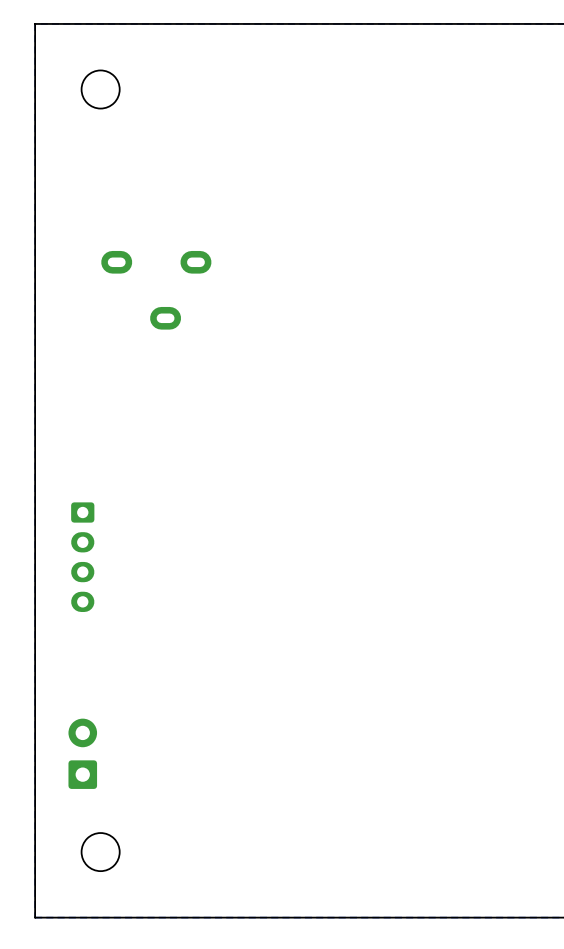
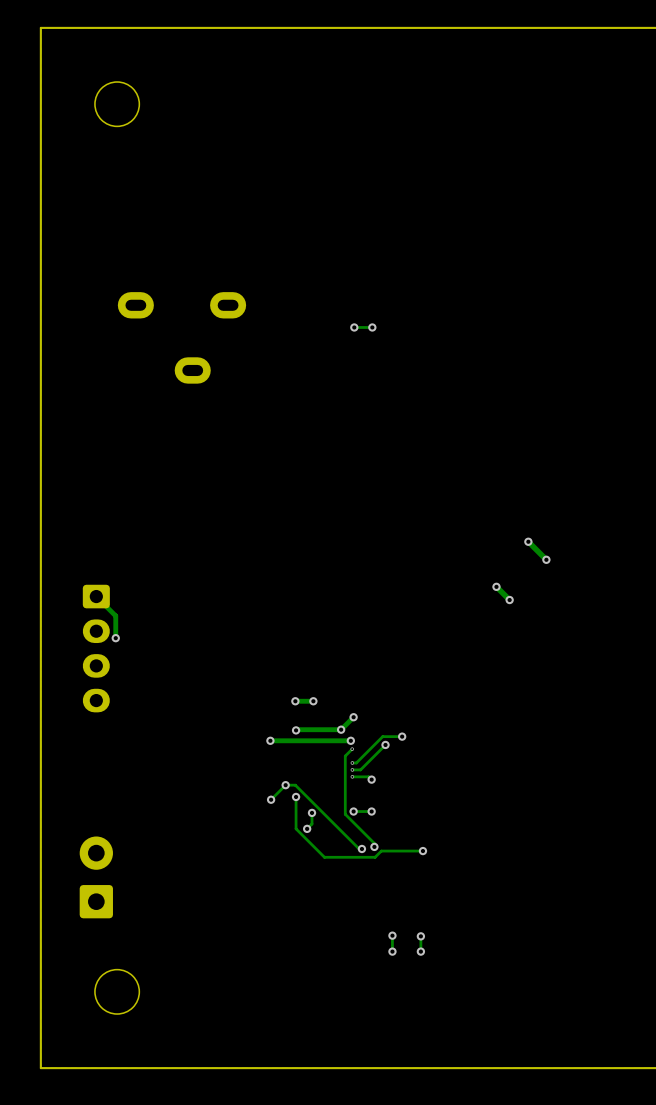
via: none -> (354, 327)
track: none -> (372, 327) (354, 327)
via: none -> (372, 327)
track: none -> (528, 541) (546, 559)
via: none -> (528, 541)
via: none -> (546, 559)
track: none -> (496, 586) (509, 600)
via: none -> (496, 586)
track: none -> (96, 596) (115, 615) (115, 638)
via: none -> (509, 600)
via: none -> (115, 638)
via: none -> (295, 701)
track: none -> (313, 701) (295, 701)
via: none -> (313, 701)
track: none -> (353, 717) (341, 729) (296, 730)
via: none -> (353, 717)
via: none -> (341, 729)
via: none -> (296, 730)
track: none -> (402, 736) (382, 736) (356, 762) (352, 762)
via: none -> (402, 736)
via: none -> (270, 740)
track: none -> (350, 740) (270, 740)
via: none -> (350, 740)
track: none -> (385, 744) (360, 769) (352, 769)
via: none -> (385, 744)
track: none -> (352, 749) (345, 756) (345, 814) (374, 843) (374, 846)
via: none -> (352, 749)
via: none -> (352, 762)
via: none -> (352, 769)
track: none -> (352, 776) (368, 776) (371, 779)
via: none -> (352, 776)
via: none -> (371, 779)
via: none -> (285, 785)
track: none -> (296, 796) (296, 828) (324, 857) (375, 857) (381, 851) (422, 851)
via: none -> (296, 796)
track: none -> (271, 799) (285, 785) (295, 785) (359, 848) (361, 848)
via: none -> (271, 799)
via: none -> (353, 811)
track: none -> (371, 811) (353, 811)
via: none -> (371, 811)
track: none -> (312, 812) (312, 824) (307, 828)
via: none -> (312, 812)
via: none -> (307, 828)
via: none -> (374, 846)
via: none -> (361, 848)
via: none -> (422, 851)
track: none -> (392, 935) (392, 951)
via: none -> (392, 935)
track: none -> (420, 936) (420, 951)
via: none -> (420, 936)
via: none -> (392, 951)
via: none -> (420, 951)

